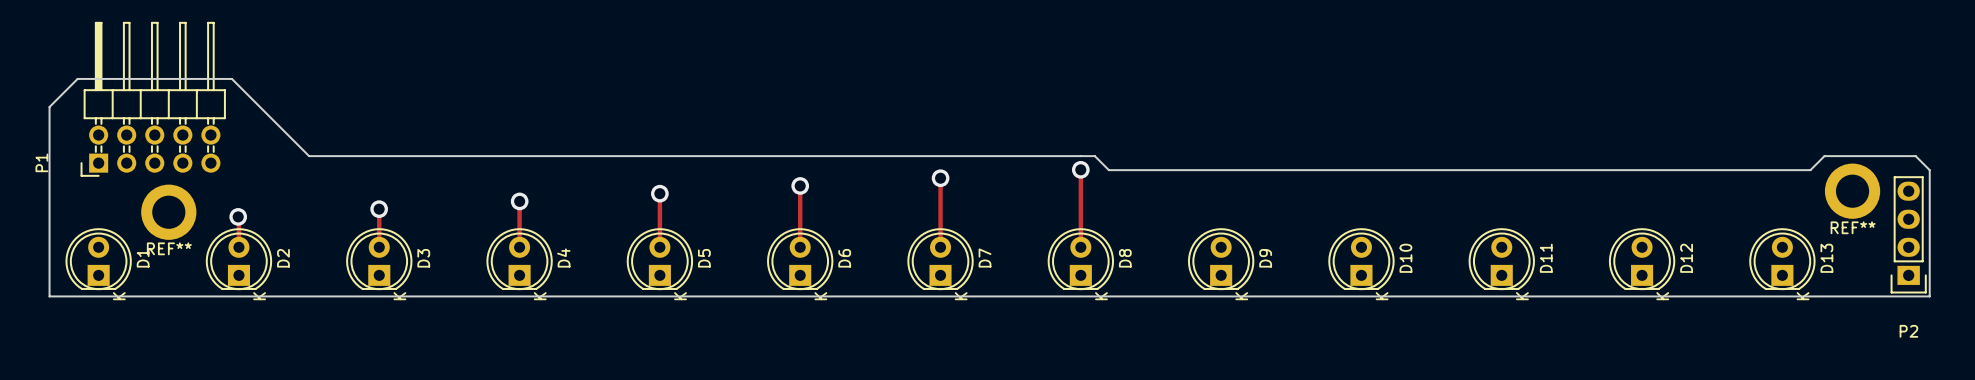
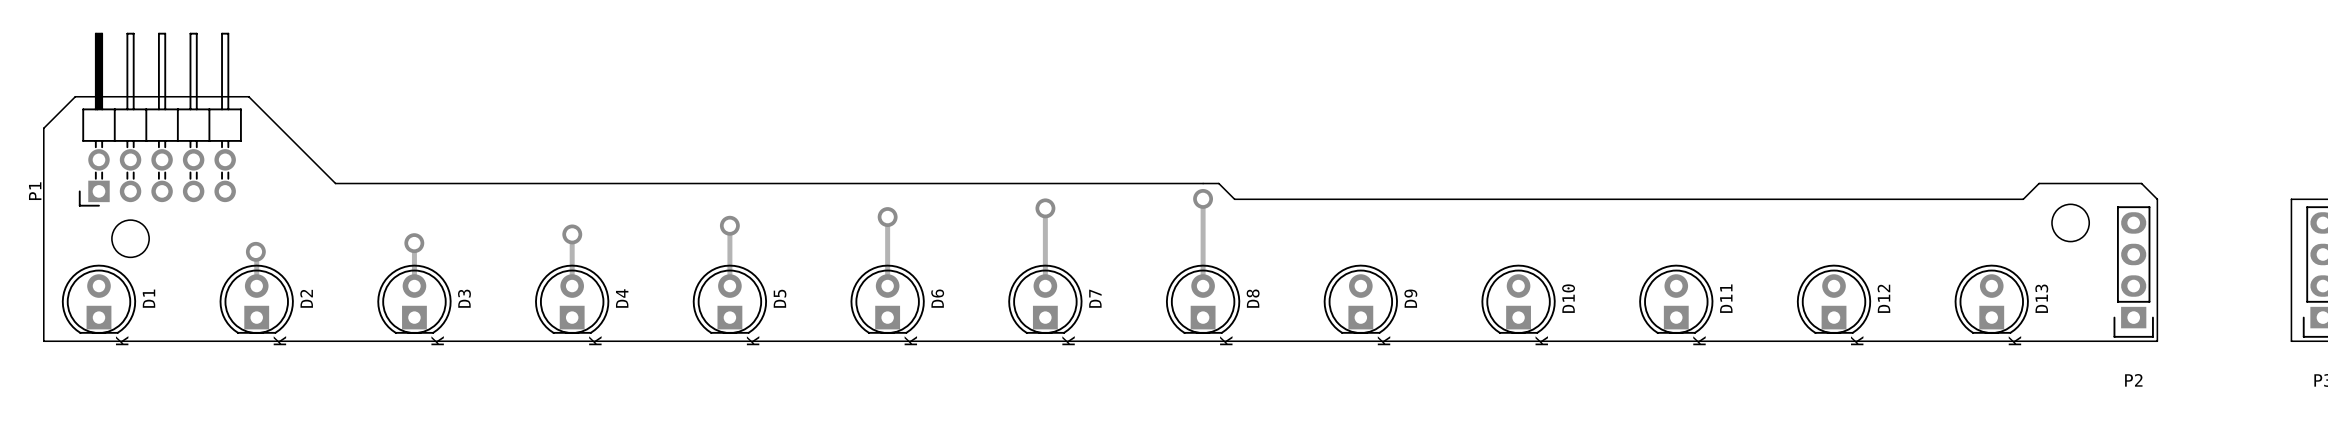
round board edge: none -> [2051, 203, 2090, 243]
round board edge: none -> [111, 219, 150, 258]
REF**: (1852, 191) -> none
REF**: (168, 212) -> none

